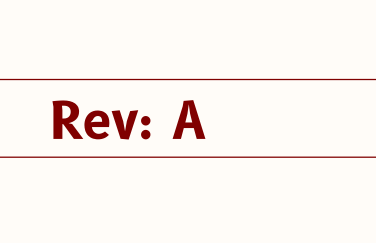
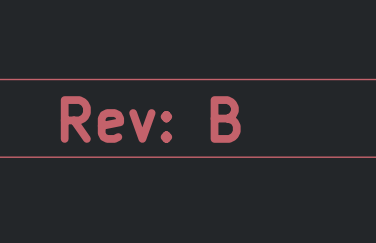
title block: Rev: A (128, 119) -> Rev: B (150, 119)

